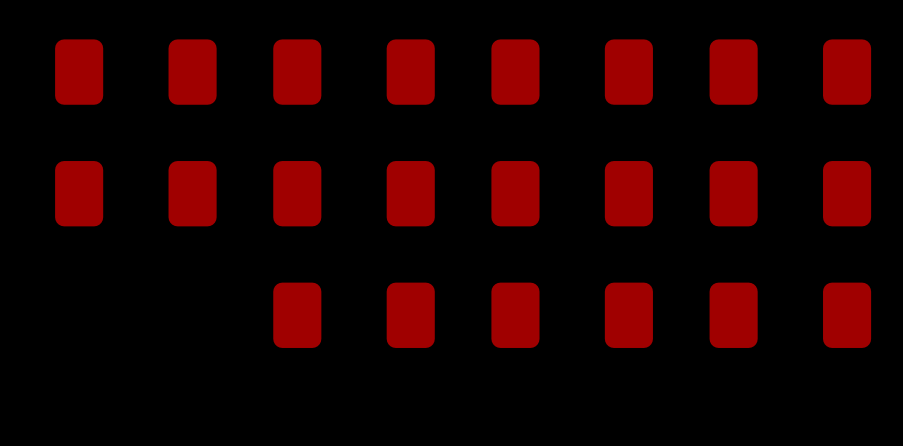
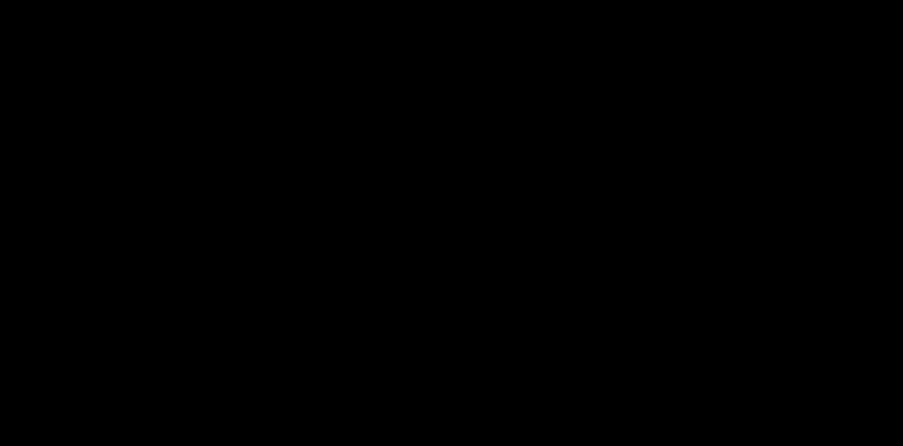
part: (135, 72) -> none
part: (354, 72) -> none
part: (572, 72) -> none
part: (790, 72) -> none
part: (135, 193) -> none
part: (354, 193) -> none
part: (572, 193) -> none
part: (790, 193) -> none
part: (354, 315) -> none
part: (572, 315) -> none
part: (790, 315) -> none

